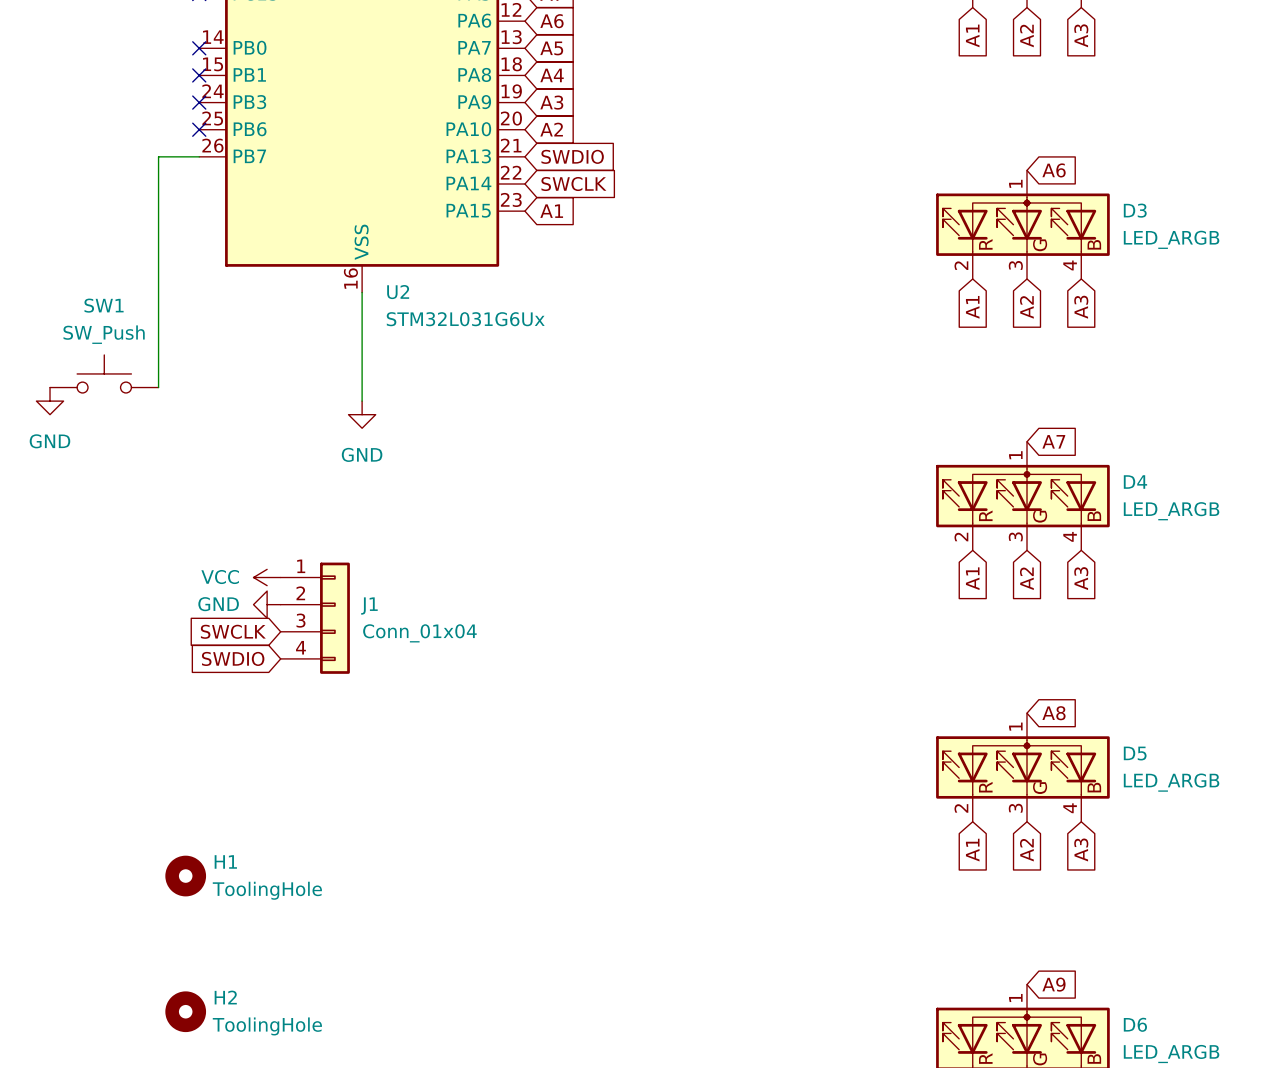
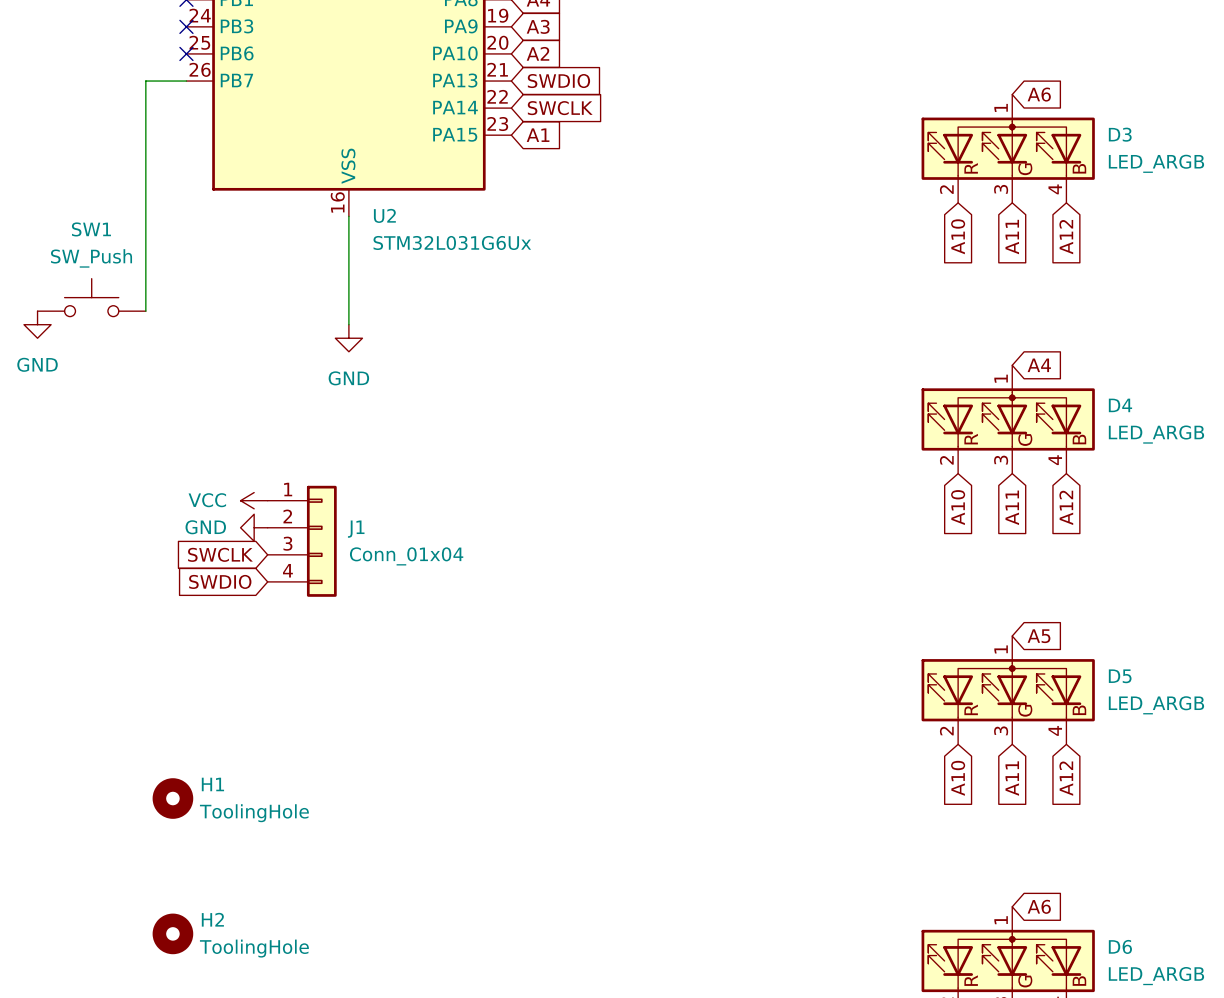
global label: A1 (972, 307) -> A10 (958, 236)
global label: A2 (1026, 307) -> A11 (1012, 237)
global label: A3 (1081, 307) -> A12 (1066, 237)
global label: A7 (1053, 441) -> A4 (1039, 365)
global label: A1 (972, 578) -> A10 (958, 507)
global label: A2 (1026, 578) -> A11 (1012, 507)
global label: A3 (1081, 578) -> A12 (1066, 507)
global label: A8 (1053, 713) -> A5 (1039, 636)
global label: A3 (1081, 849) -> A12 (1066, 778)
global label: A1 (972, 850) -> A10 (958, 778)
global label: A2 (1026, 850) -> A11 (1012, 778)
global label: A9 (1053, 984) -> A6 (1039, 906)

